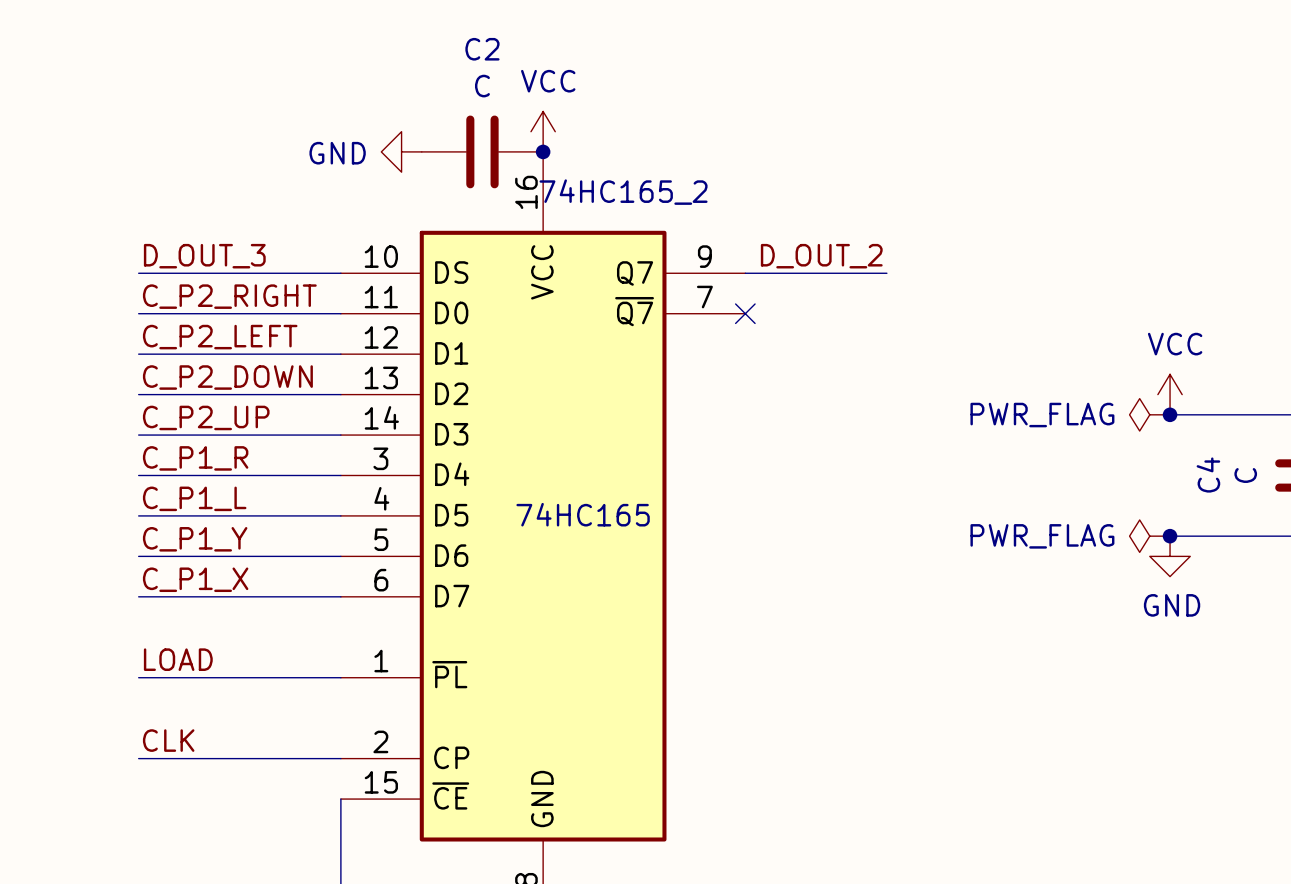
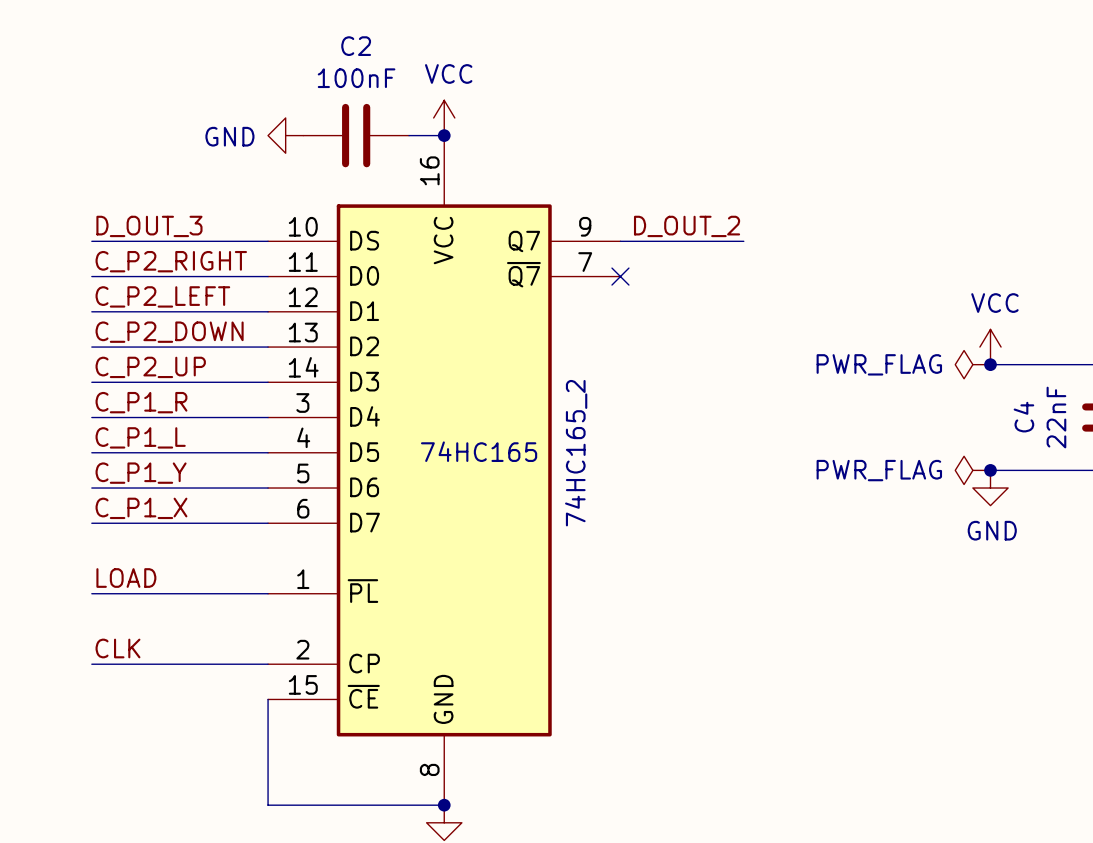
C2 value: C (482, 86) -> 100nF (356, 78)
power symbol position: GND (401, 151) -> GND (285, 135)
C2 position: (482, 151) -> (356, 135)
74HC165_2 name rotation: 0° (623, 192) -> 90° counterclockwise (576, 453)
74HC165_2 name position: 74HC165_2 (623, 192) -> 74HC165_2 (576, 453)
C4 value: C (1245, 475) -> 22nF (1056, 417)

